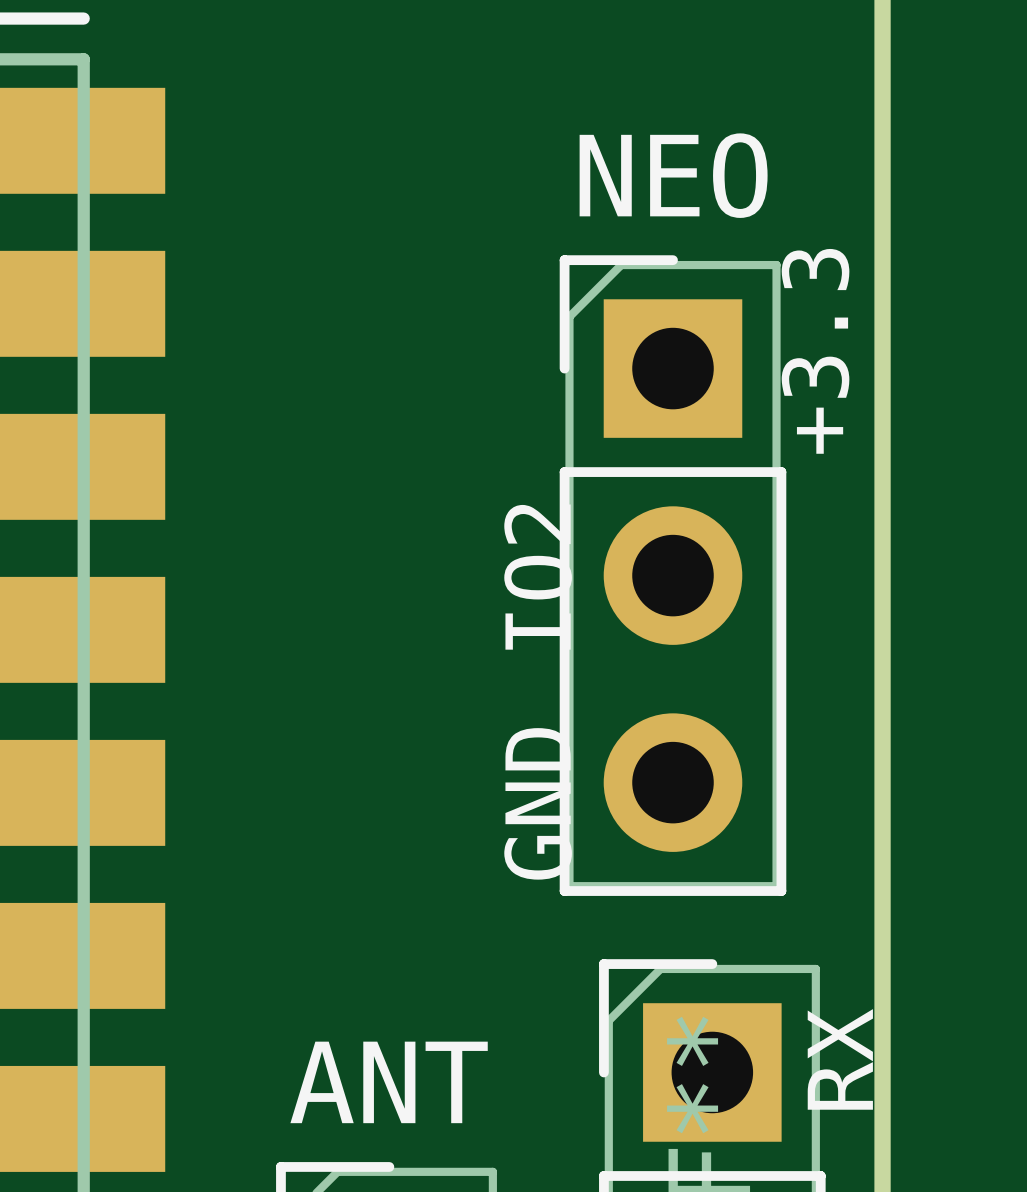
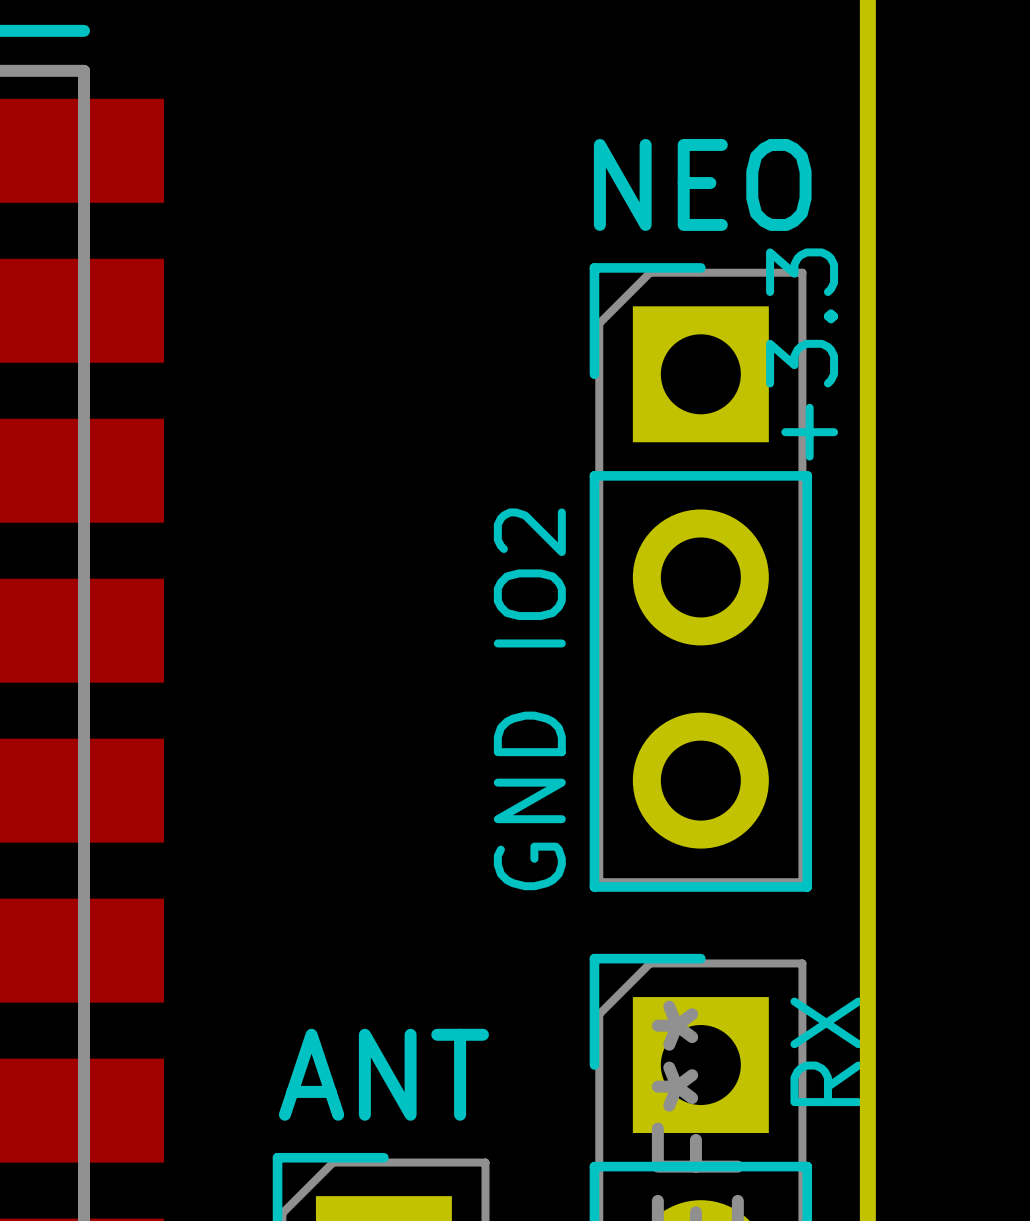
NEO position: (672, 575) -> (700, 577)

